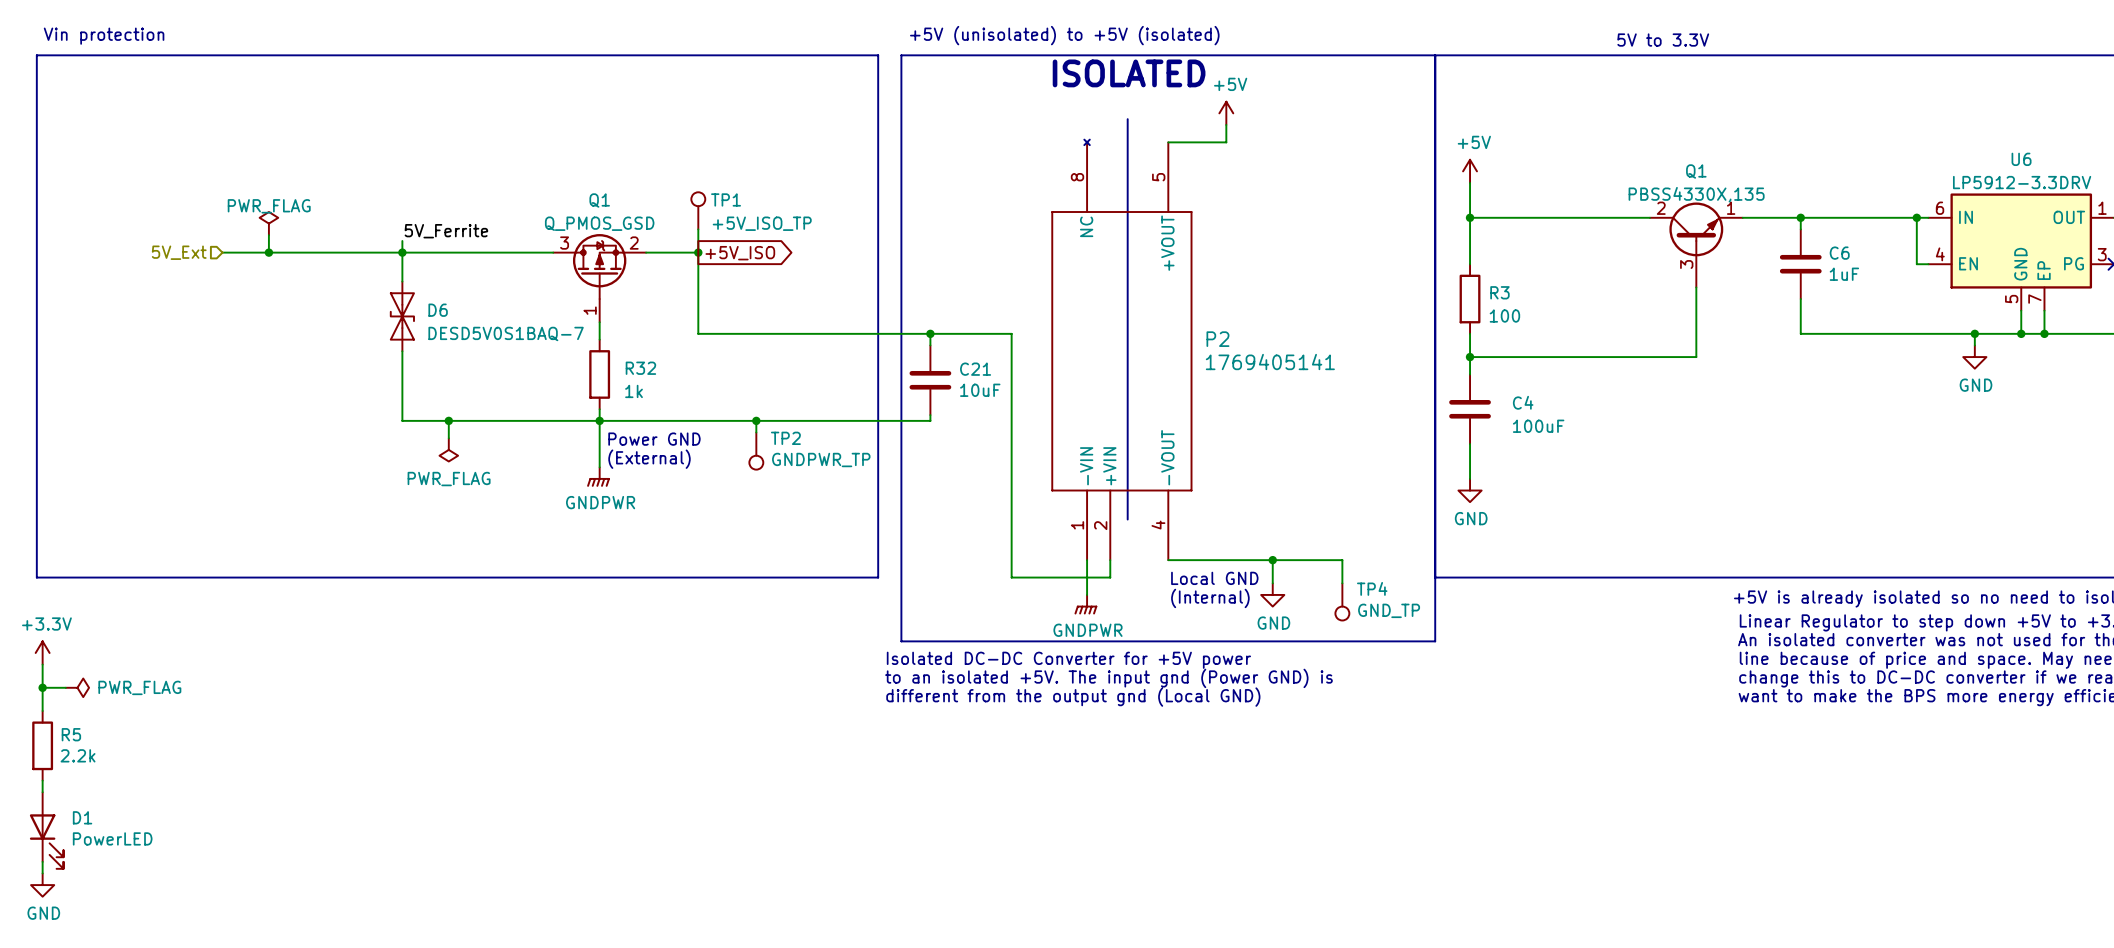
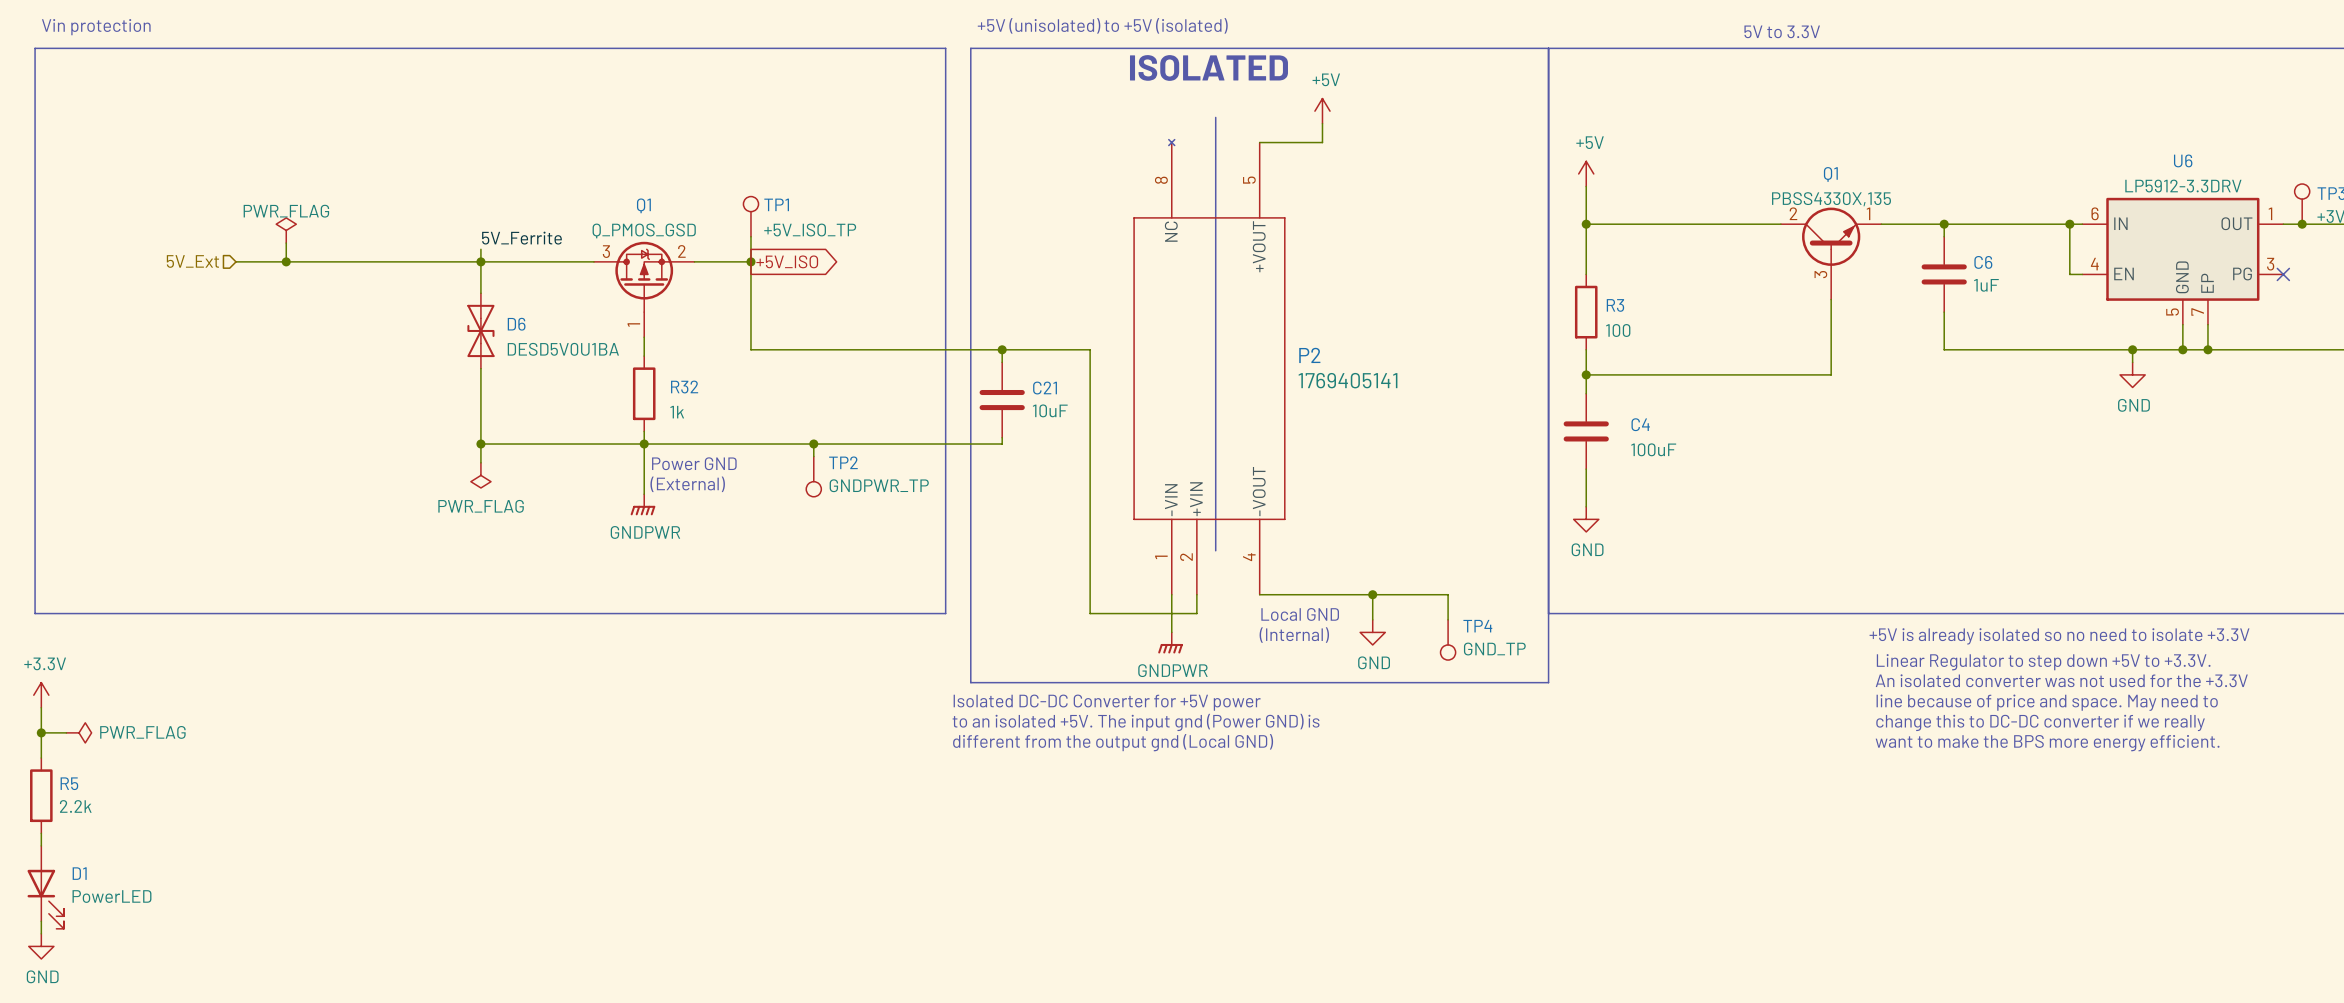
label position: 5V_Ferrite (446, 231) -> 5V_Ferrite (521, 238)
wire: (402, 241) (402, 281) -> (480, 249) (480, 293)
junction position: (402, 252) -> (480, 261)
D6 position: (402, 316) -> (480, 330)
D6 value: DESD5V0S1BAQ-7 (506, 333) -> DESD5V0U1BA (563, 349)
wire: (402, 351) (402, 420) (448, 420) -> (480, 368) (480, 444)

